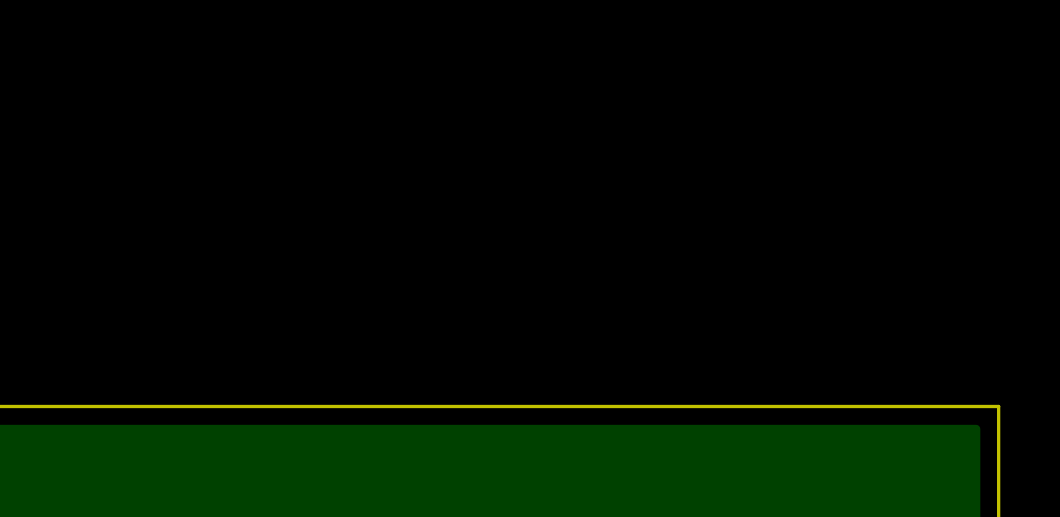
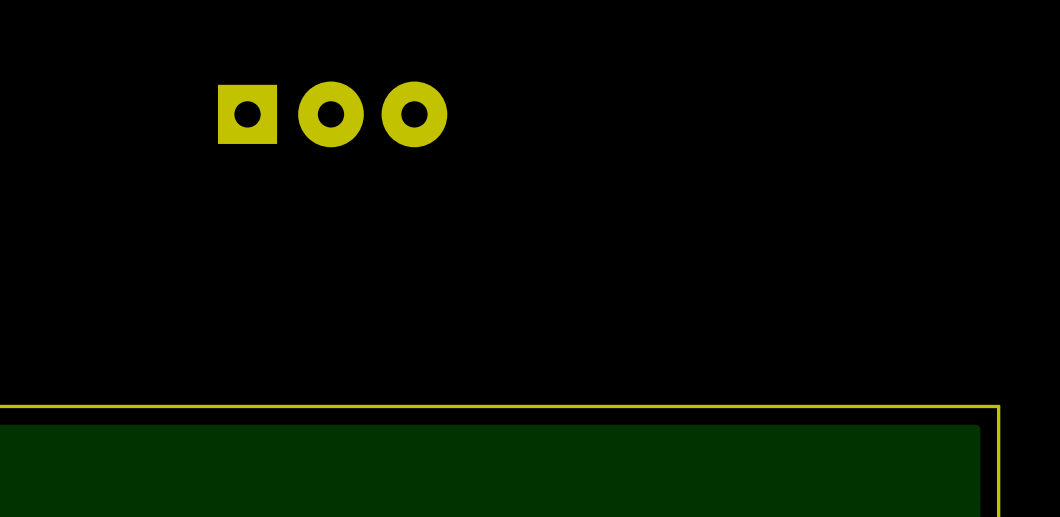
part: none -> (332, 114)

